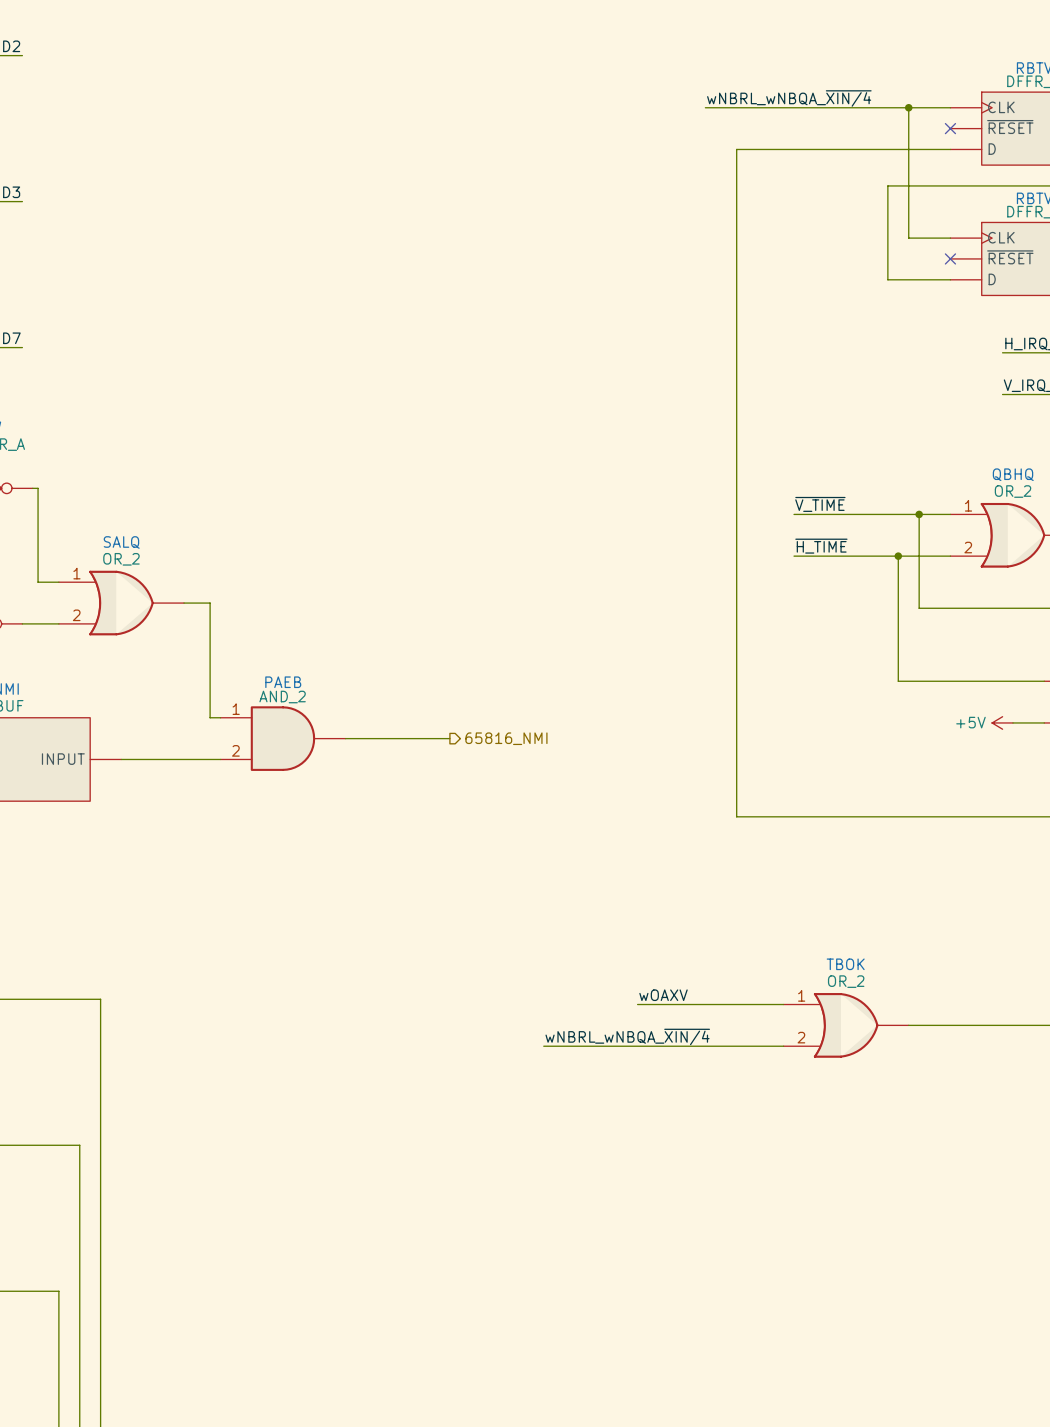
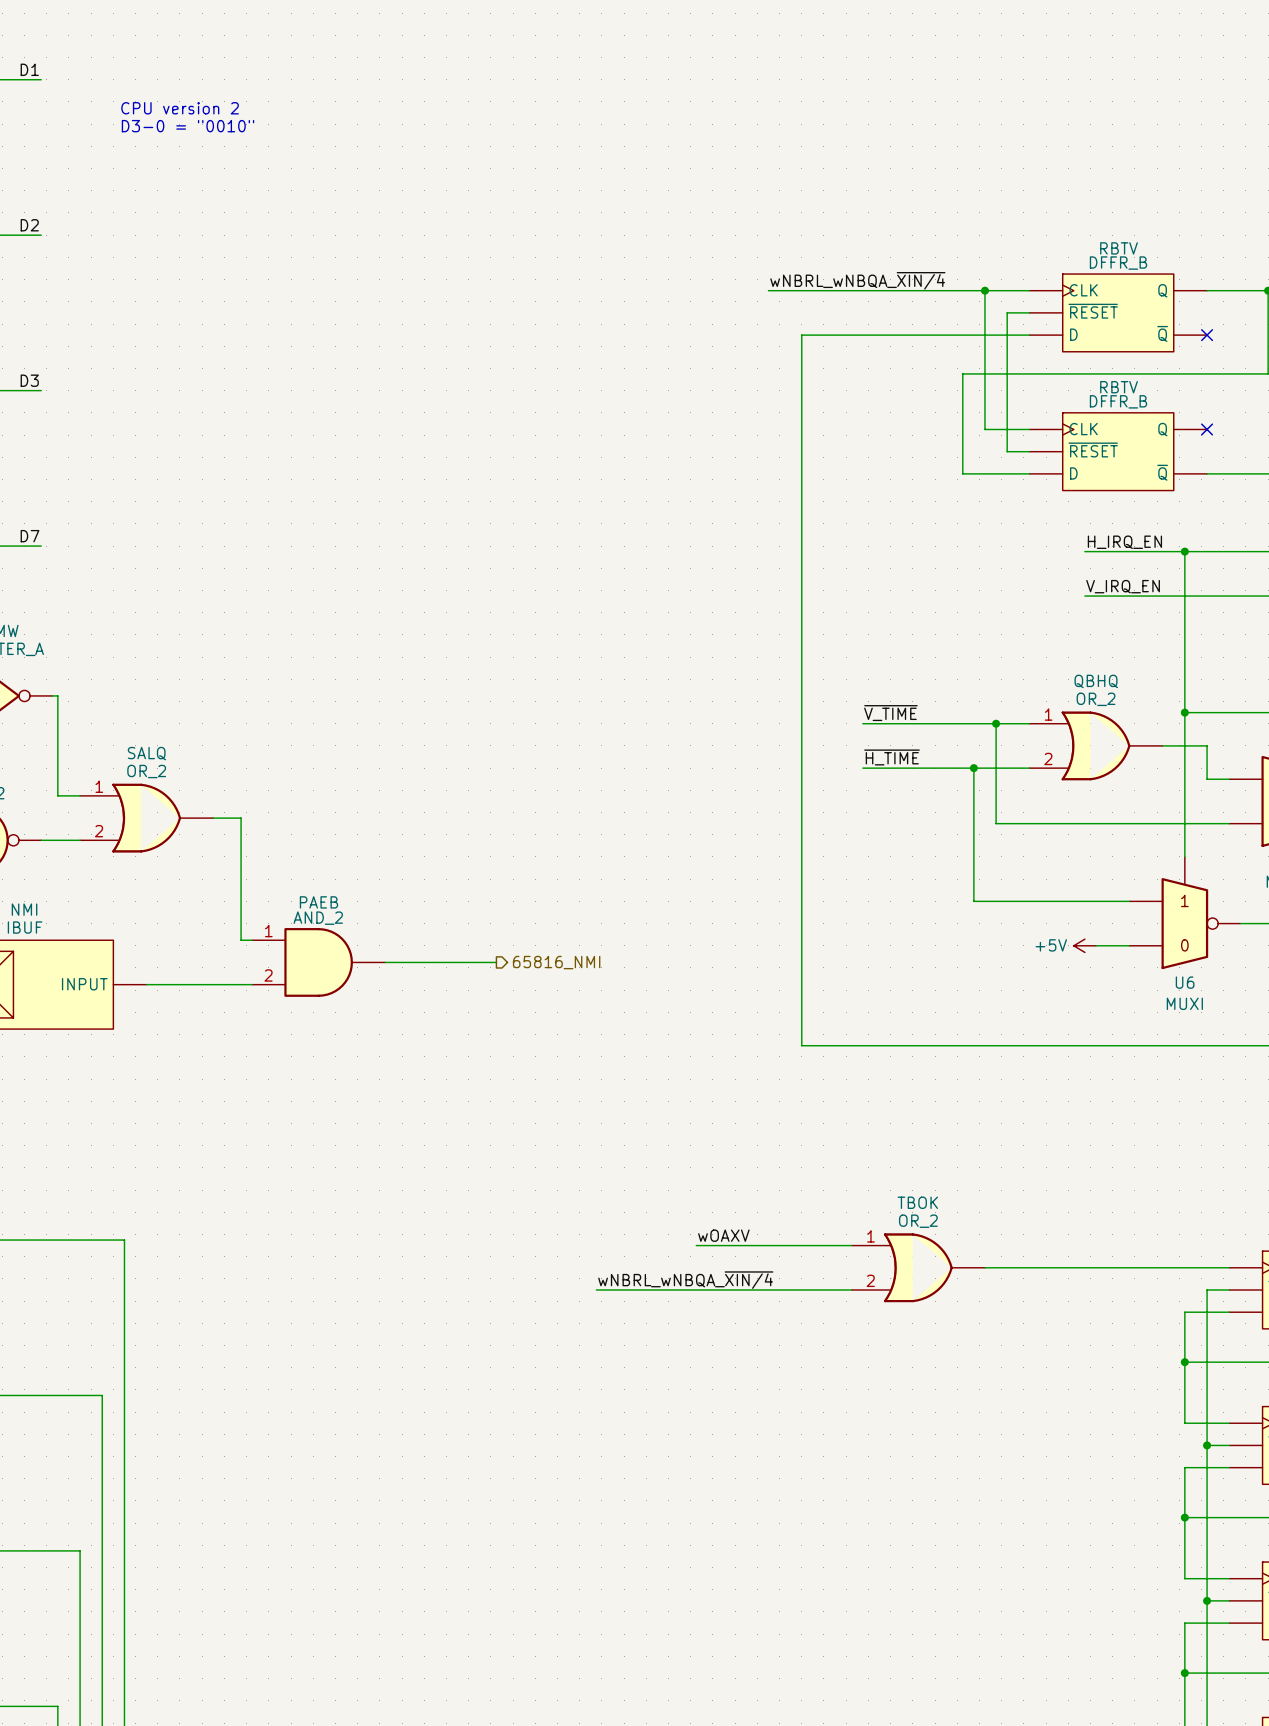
wire: none -> (1029, 312) (1007, 312) (1007, 451) (1029, 451)
no-connect mark: (950, 128) -> none
no-connect mark: (950, 258) -> none

